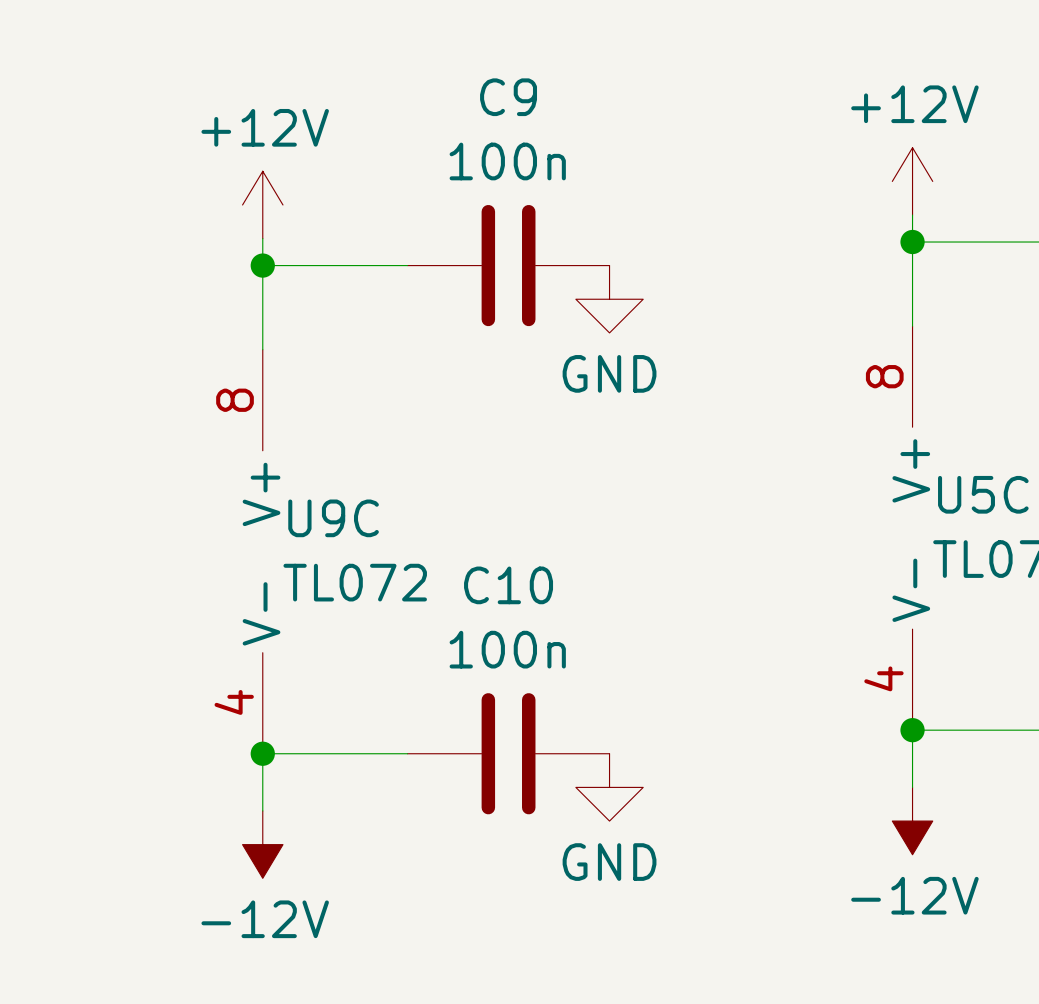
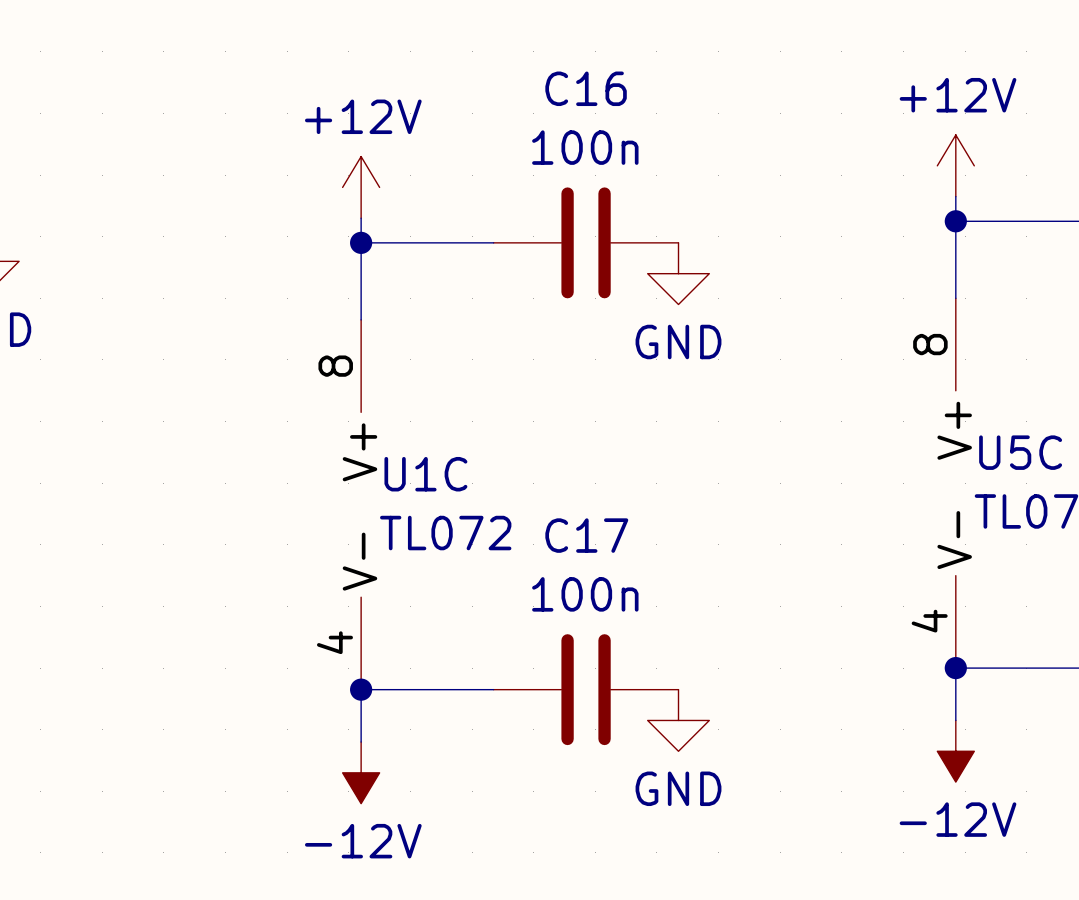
C9 name: C9 (508, 97) -> C16 (586, 88)
U9C name: U9C (333, 518) -> U1C (425, 474)
C10 name: C10 (508, 585) -> C17 (586, 535)

